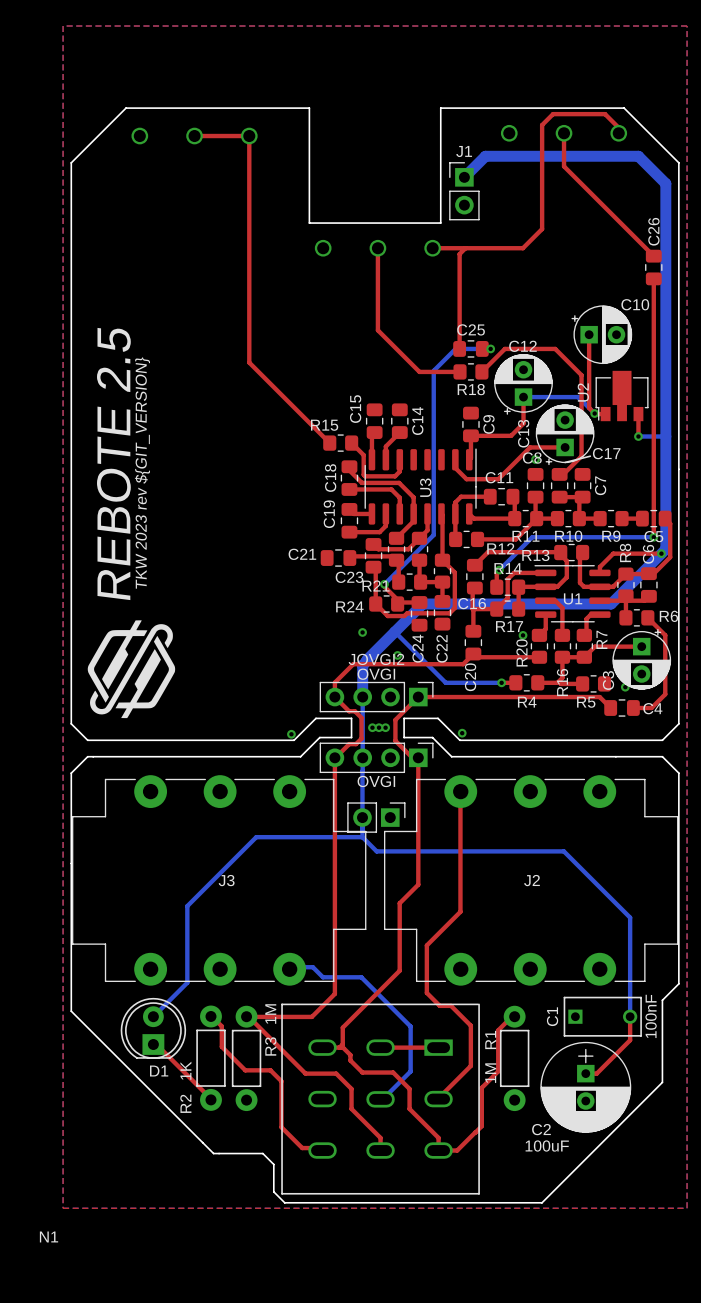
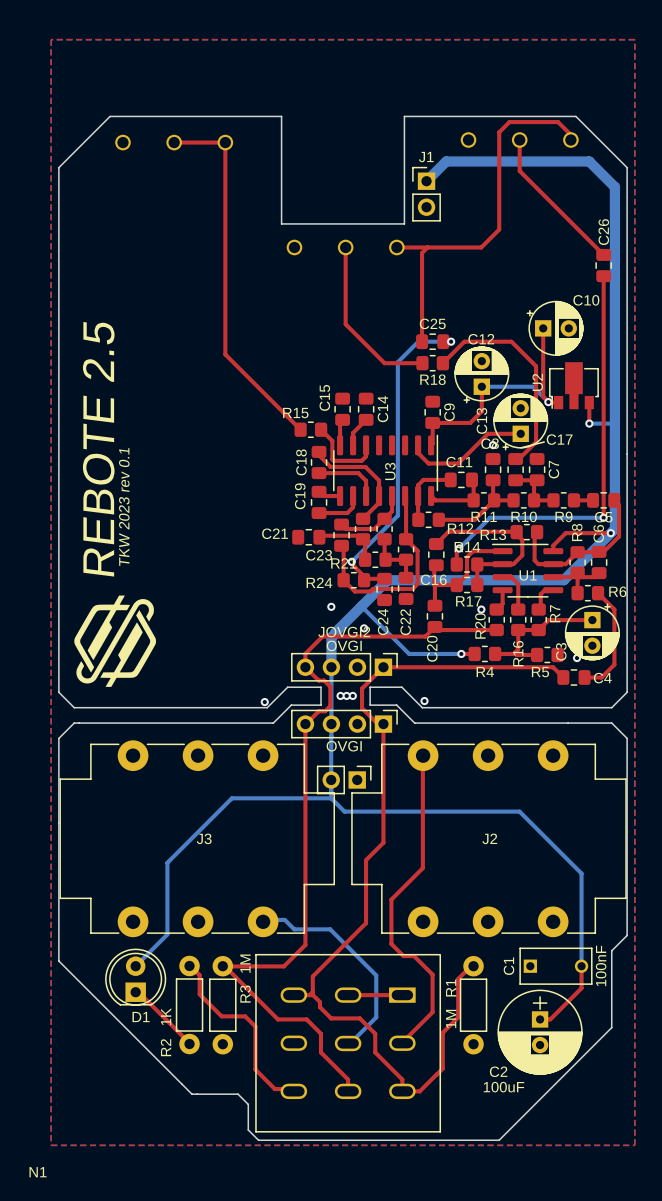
text: TKW 2023 rev ${GIT_VERSION} (142, 473) -> TKW 2023 rev 0.1 (124, 507)

